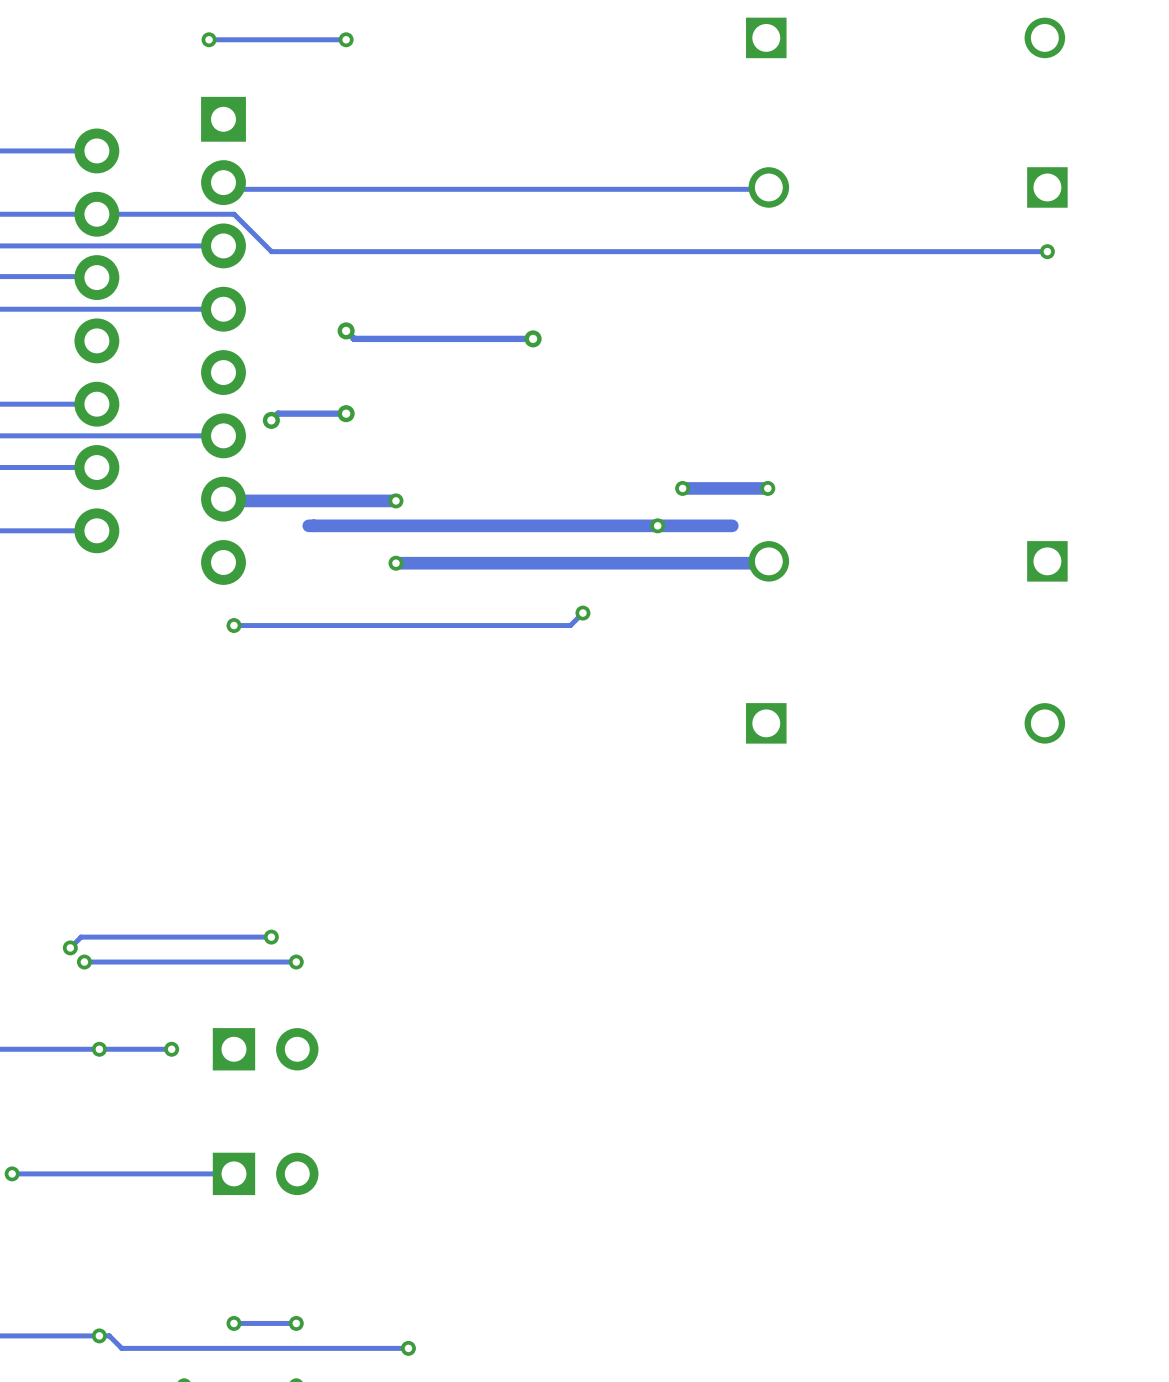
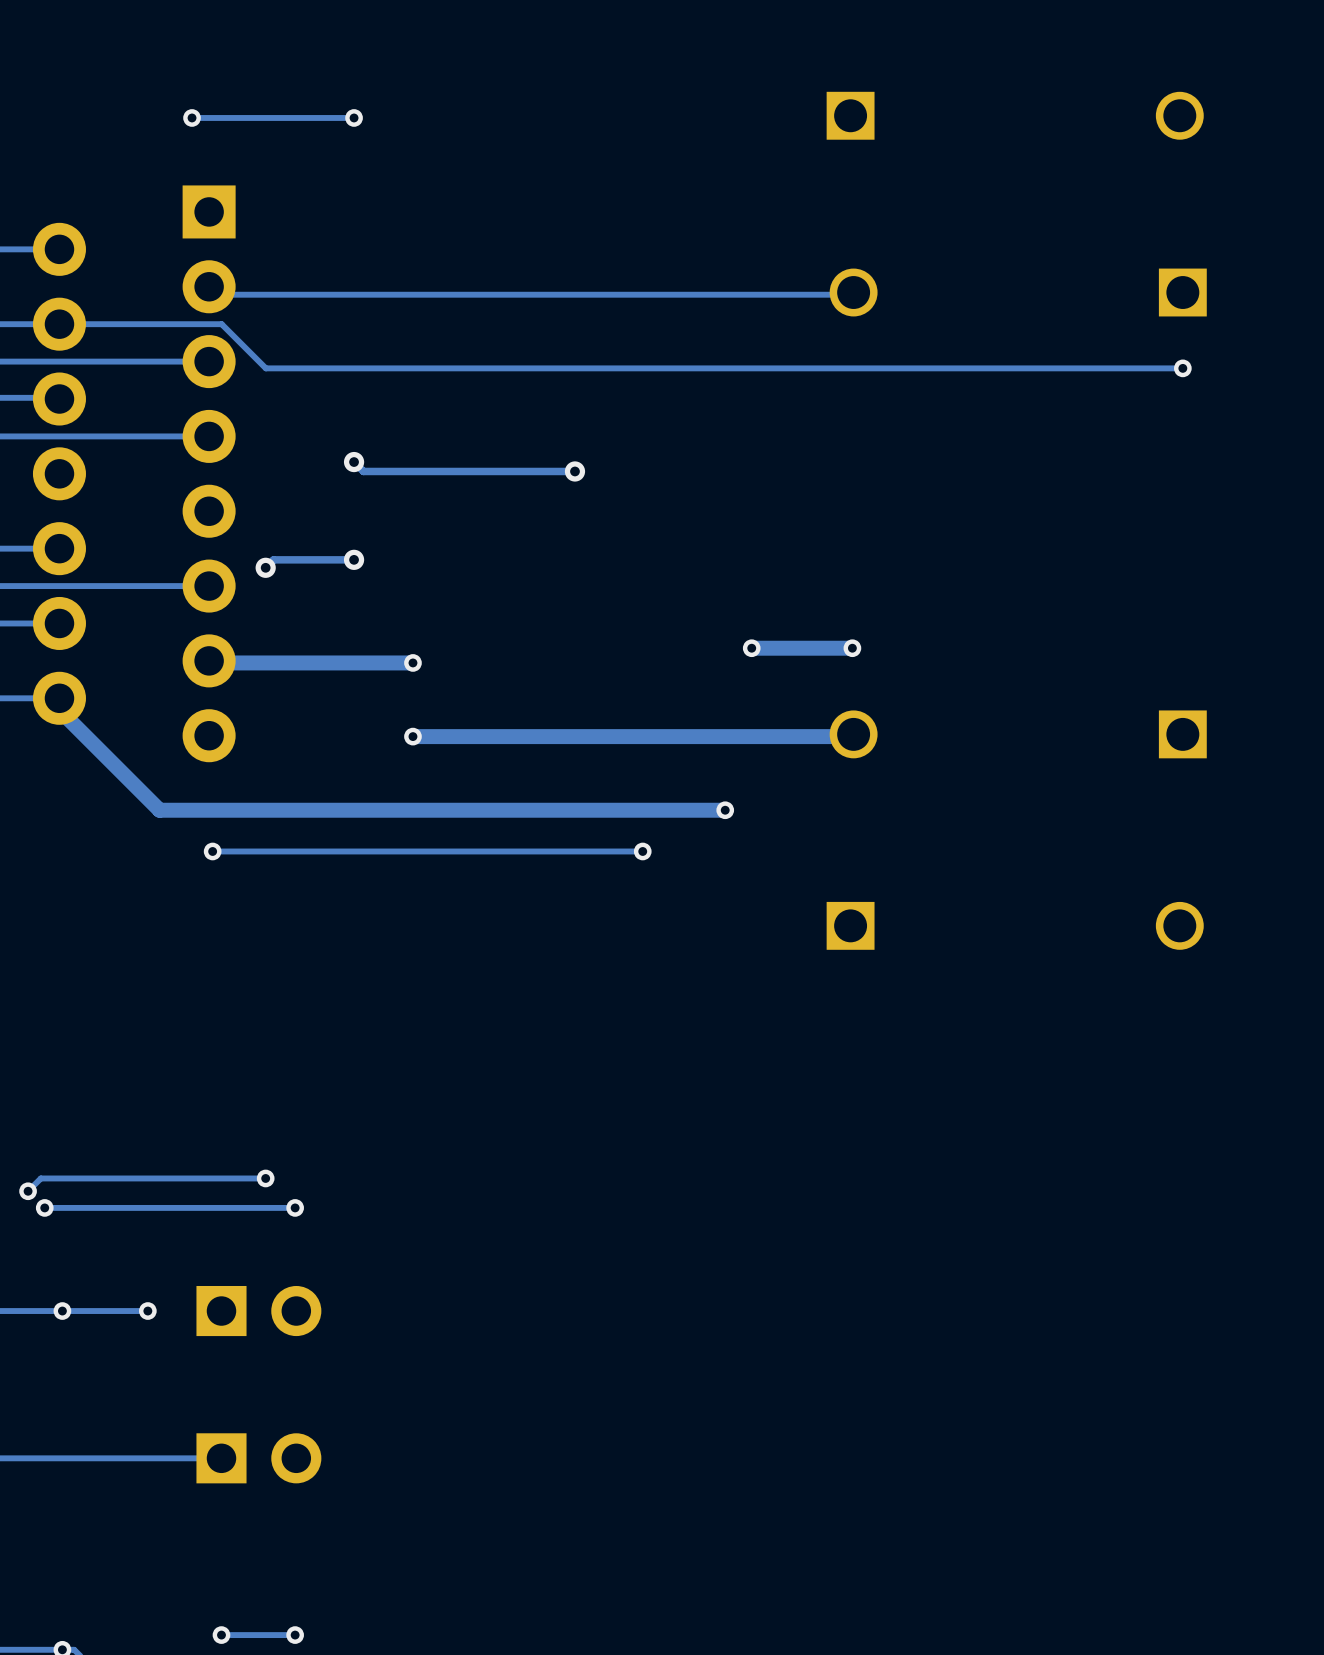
via: (657, 525) -> none
track: (732, 525) (308, 525) -> none
track: none -> (59, 698) (59, 710) (159, 810) (221, 810)
track: (582, 613) (570, 625) -> (725, 810) (619, 810)
via: (582, 613) -> none
via position: (233, 625) -> (212, 851)
track width: thin (570, 625) (233, 625) -> thick (619, 810) (221, 810)
via: none -> (725, 810)
track: none -> (642, 851) (212, 851)
via: none -> (642, 851)

